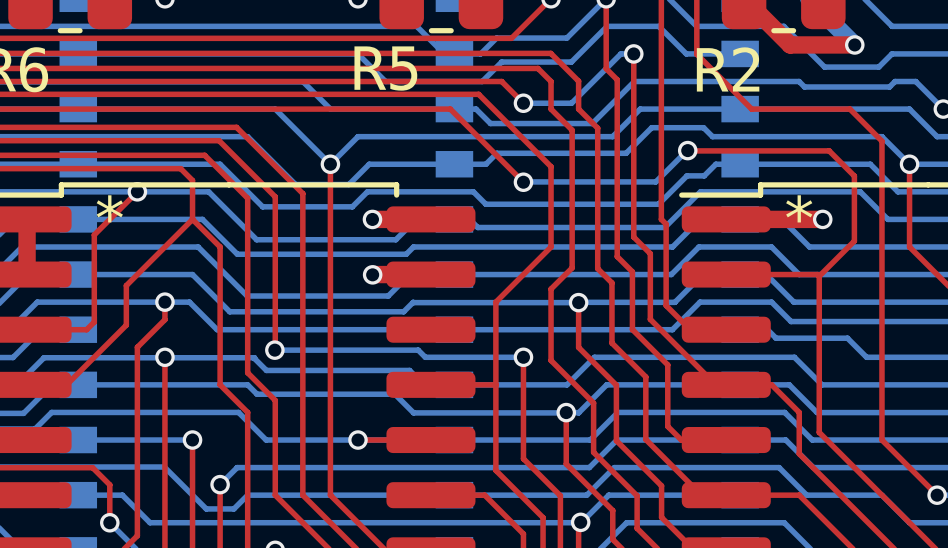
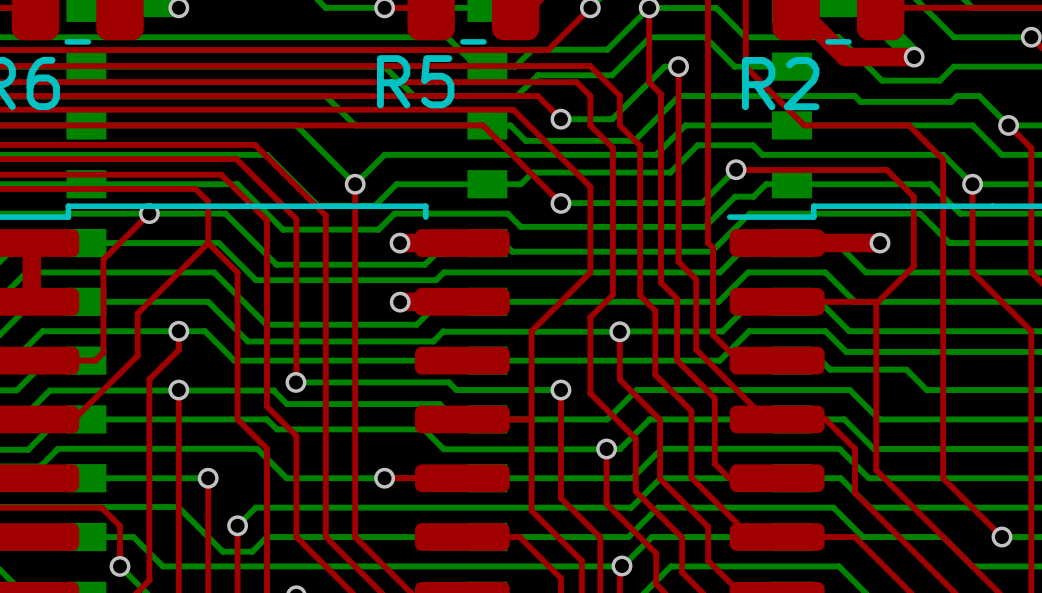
part text: * (109, 208) -> none
part text: * (799, 208) -> none

